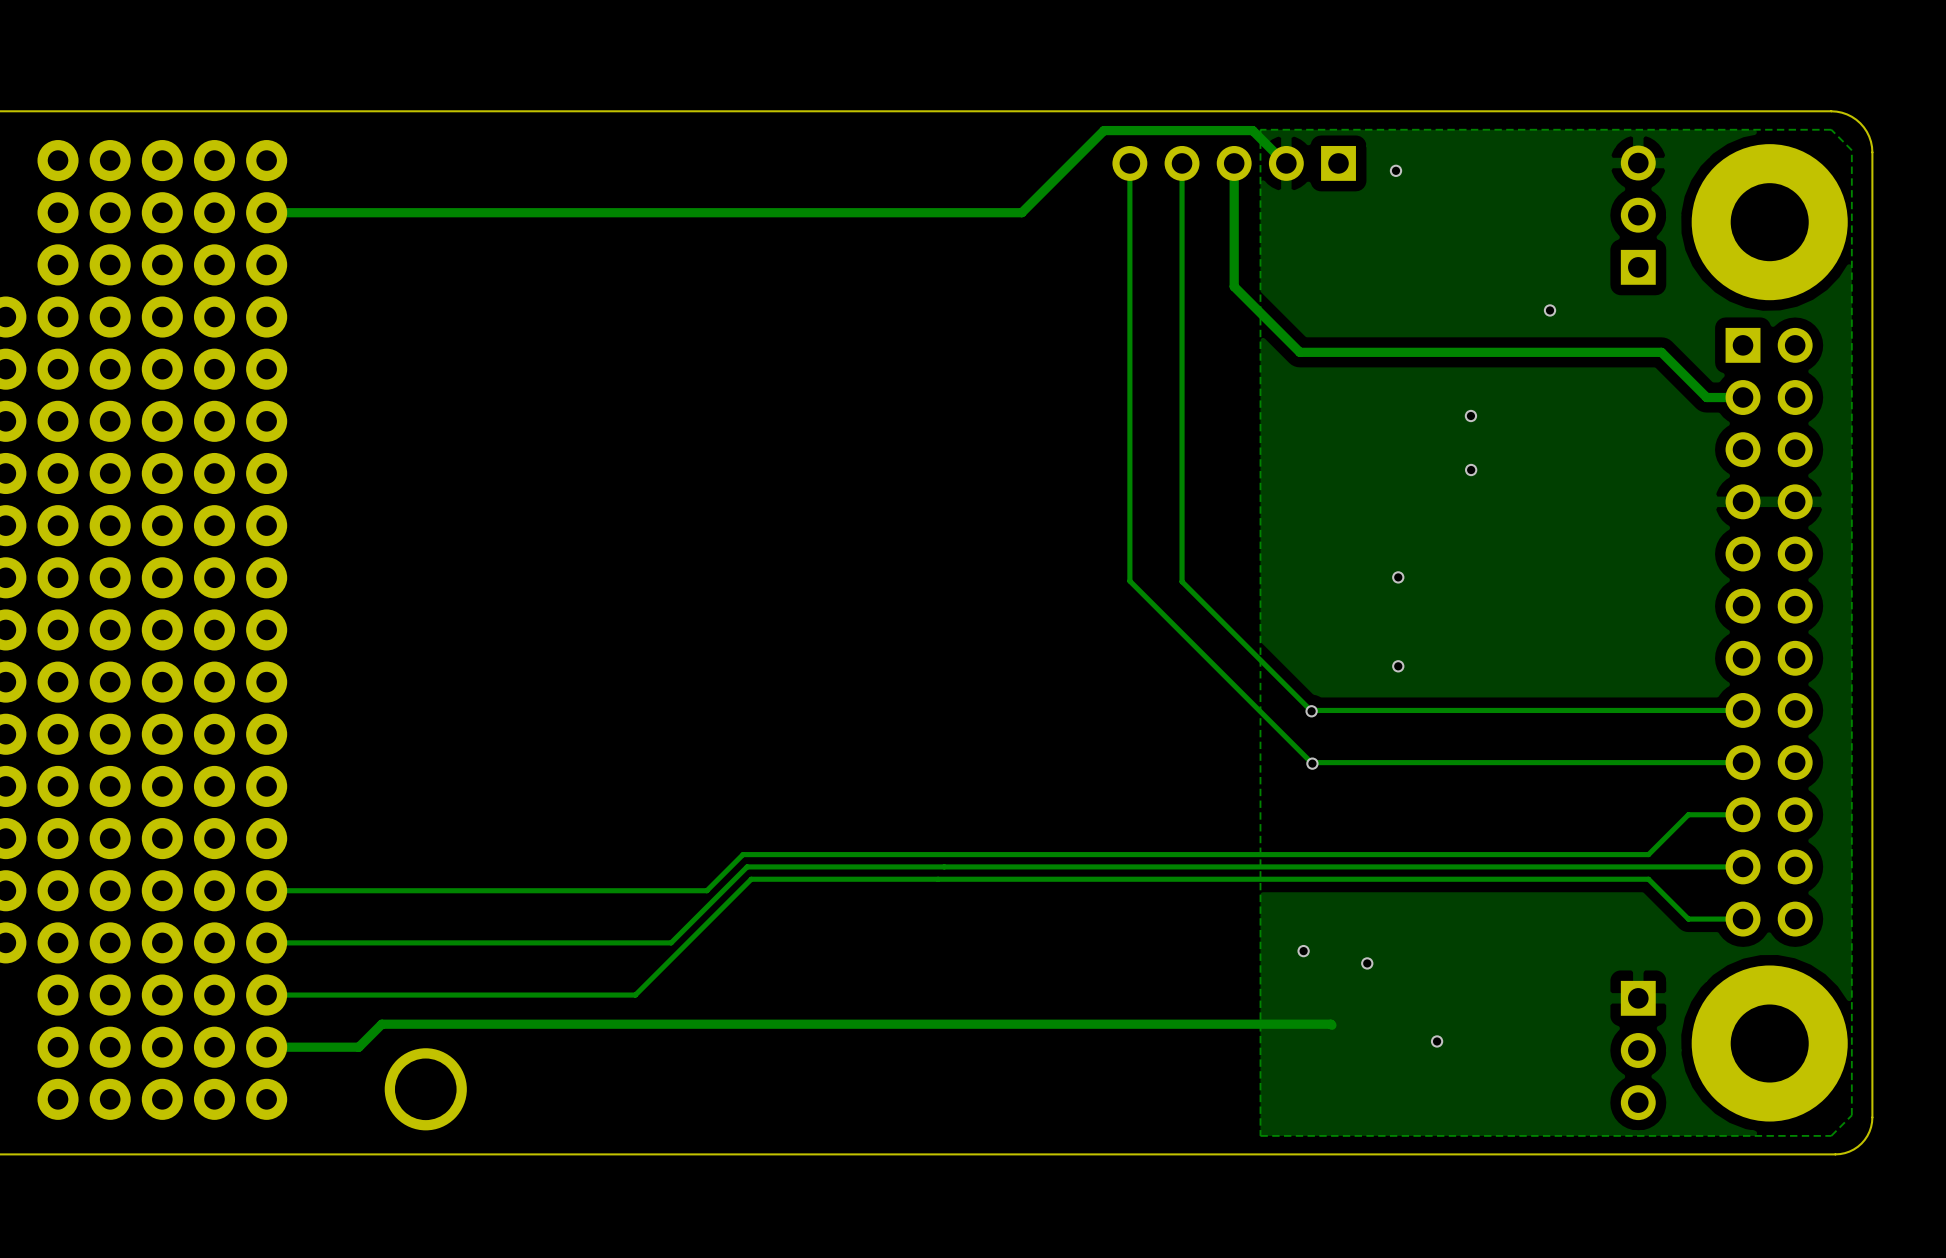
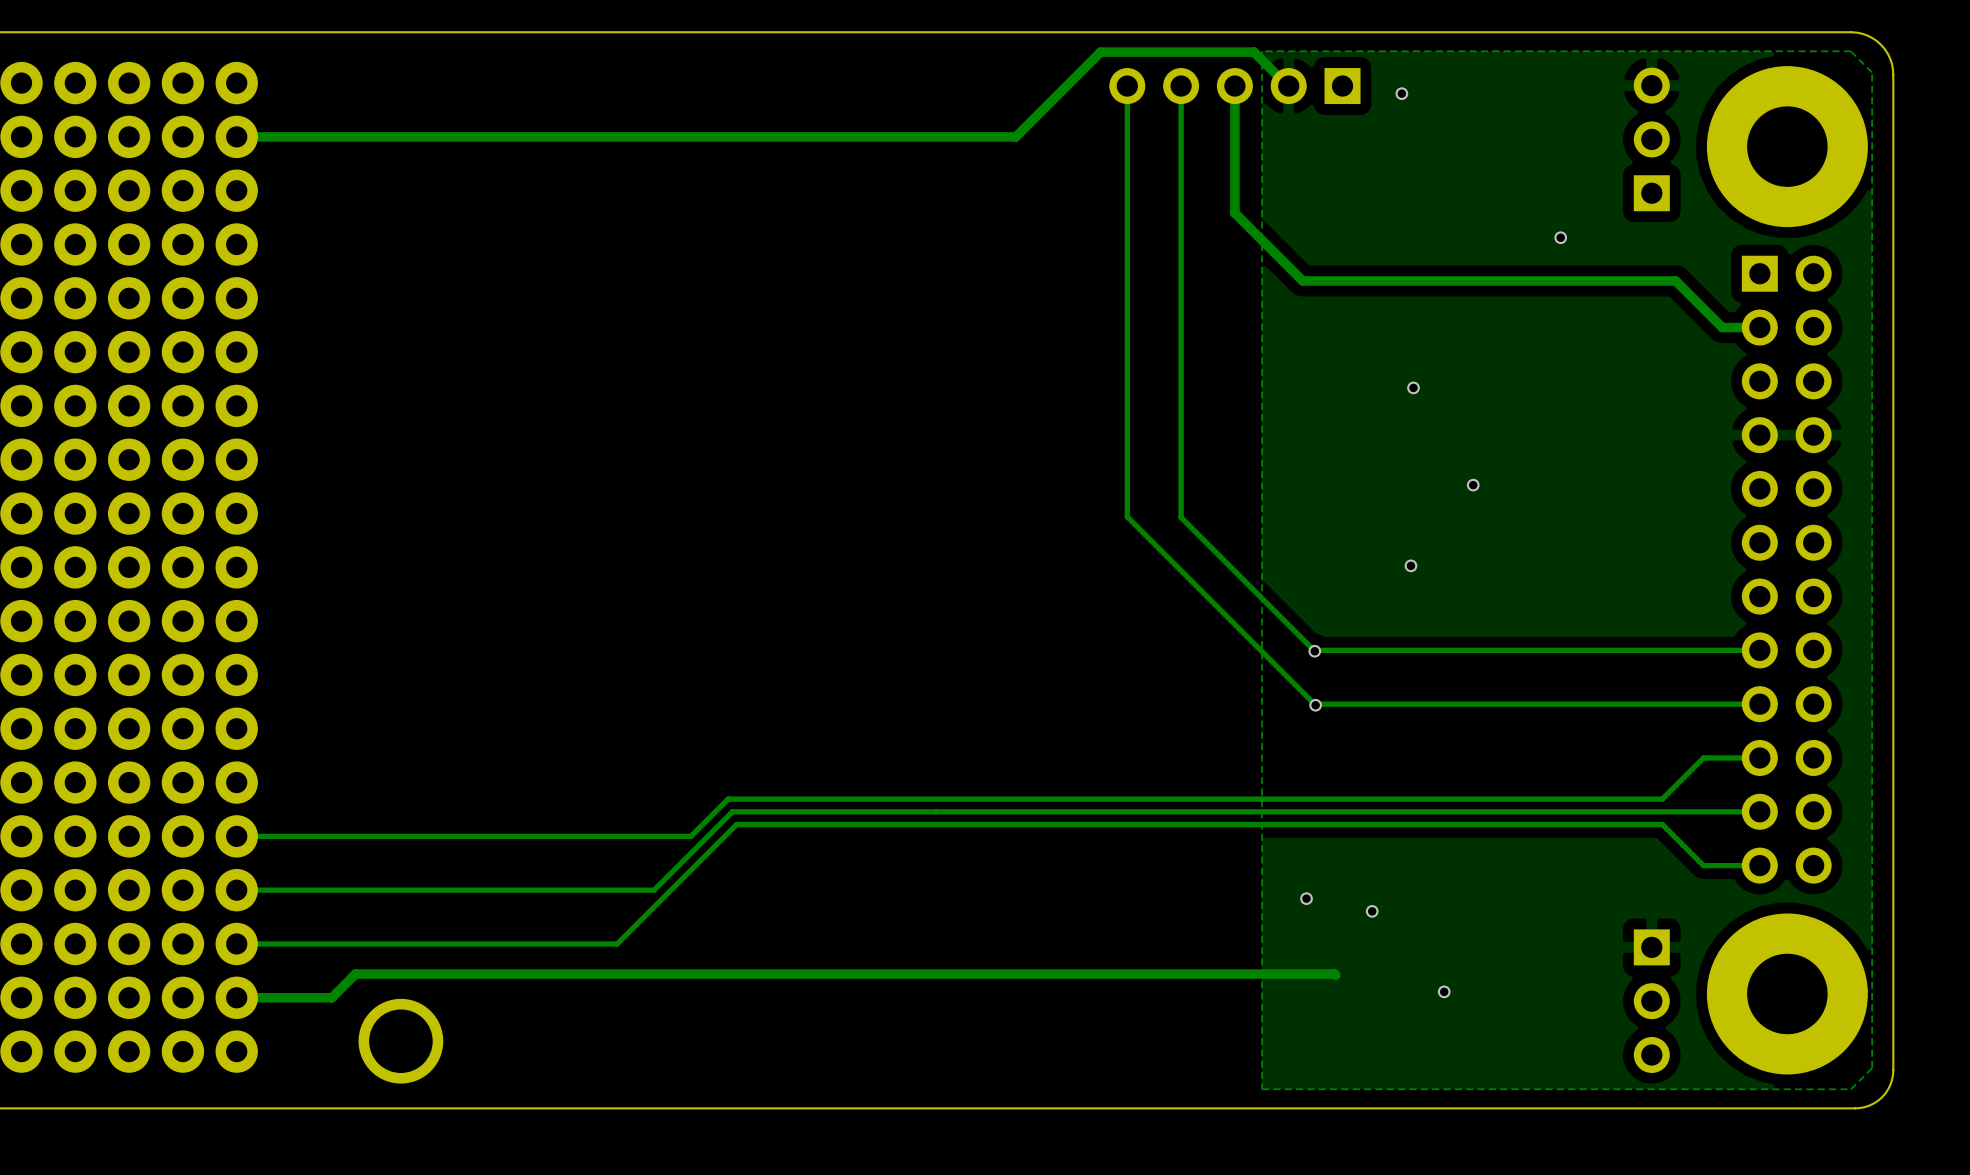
via: (1470, 416) -> none
via: none -> (1413, 387)
via: (1471, 470) -> none
via: none -> (1473, 485)
via: (1398, 577) -> none
via: none -> (1410, 565)
via: (1398, 666) -> none

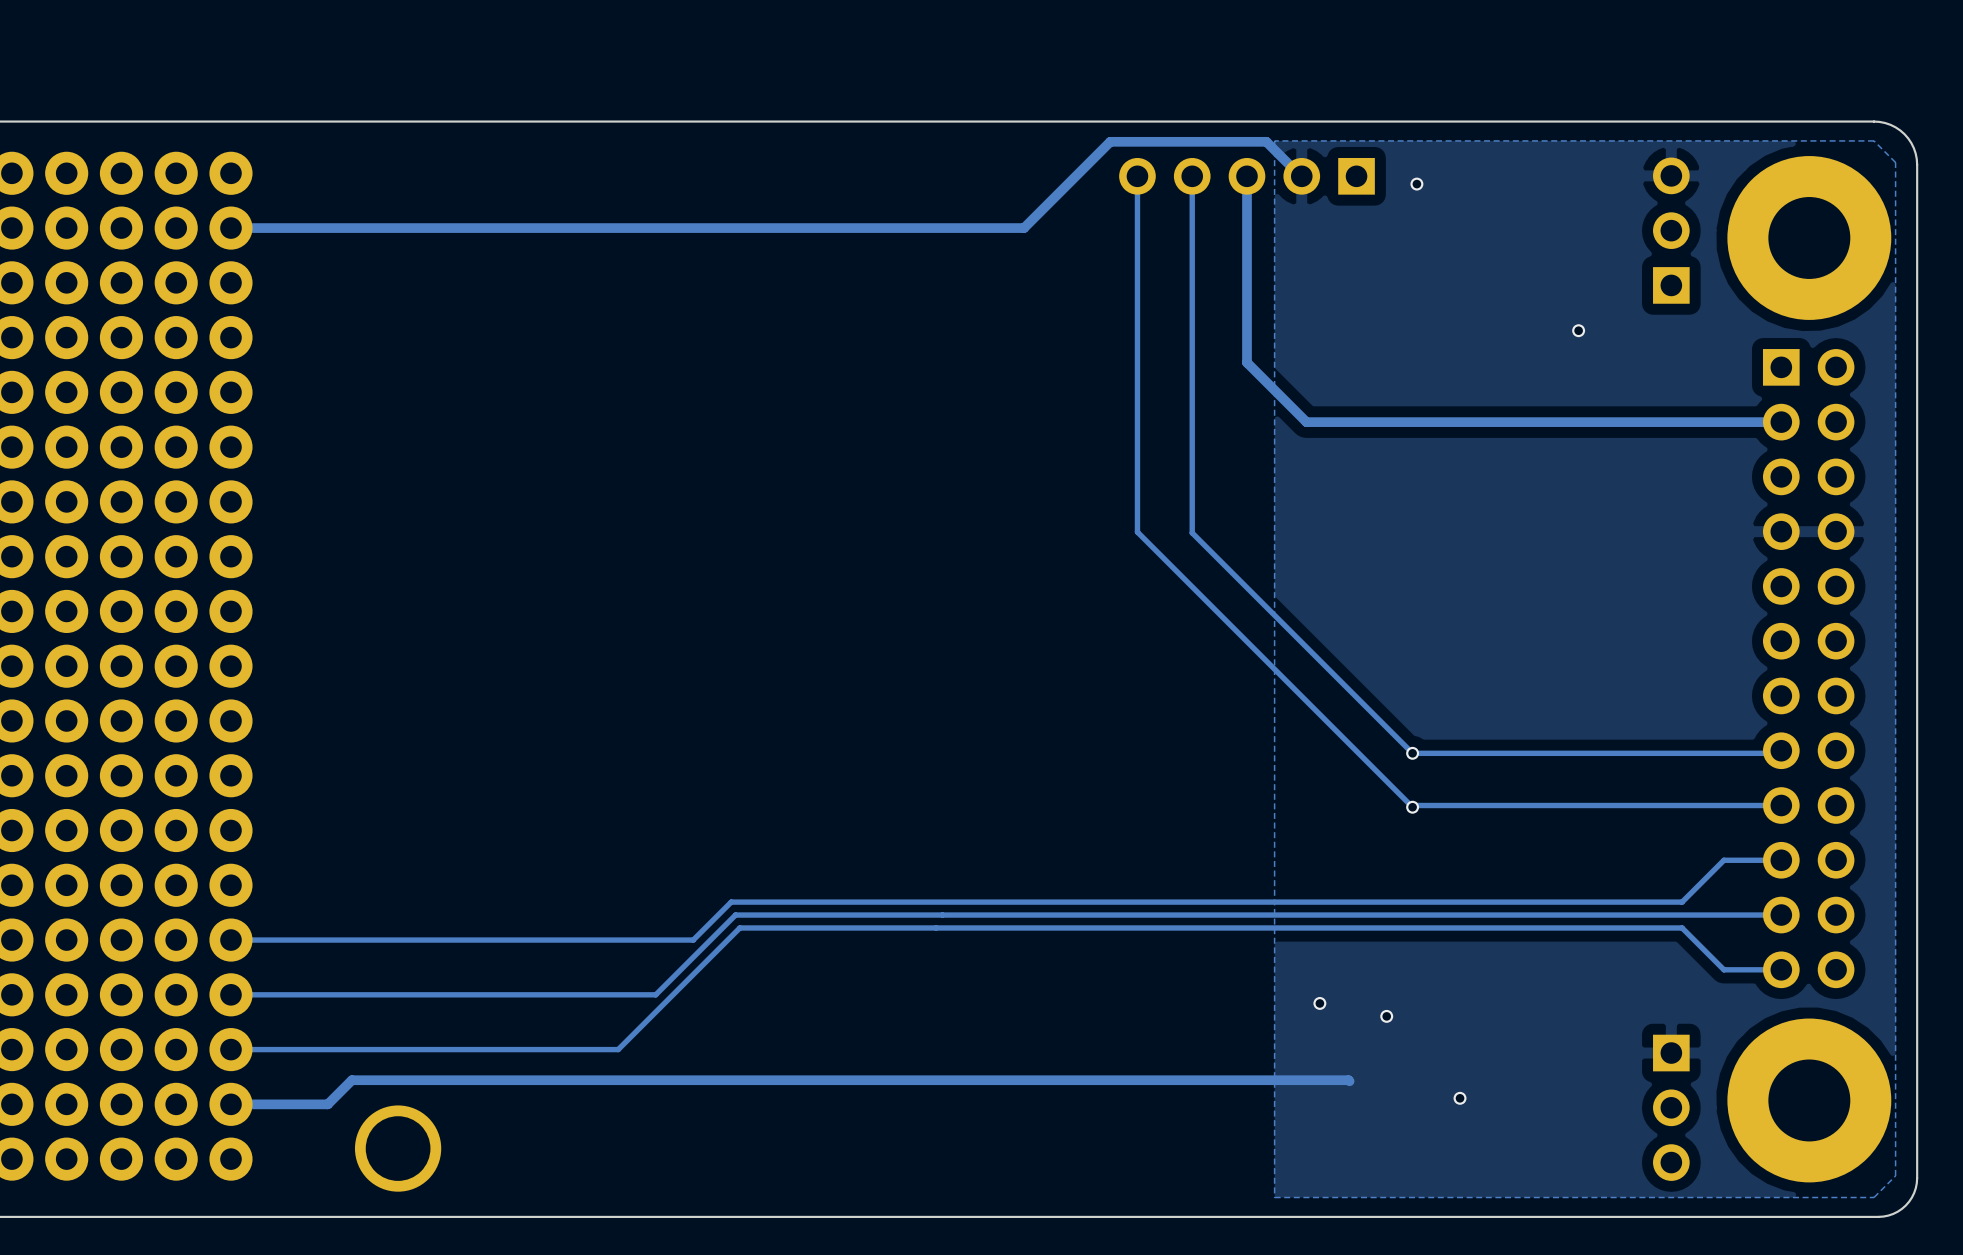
track: (1234, 213) (1302, 280) (1675, 280) (1722, 327) -> (1247, 305) (1247, 362) (1306, 422) (1743, 422)
via: (1413, 387) -> none
track: (1127, 435) (1127, 516) (1315, 705) (1399, 704) -> (1137, 532) (1412, 807) (1414, 805)
track: (1181, 436) (1181, 517) (1314, 651) (1759, 650) -> (1192, 532) (1412, 753) (1778, 753)
via: (1473, 485) -> none
via: (1410, 565) -> none
via: (1314, 651) -> none
via: none -> (1412, 753)
via: (1315, 705) -> none
via: none -> (1412, 807)

